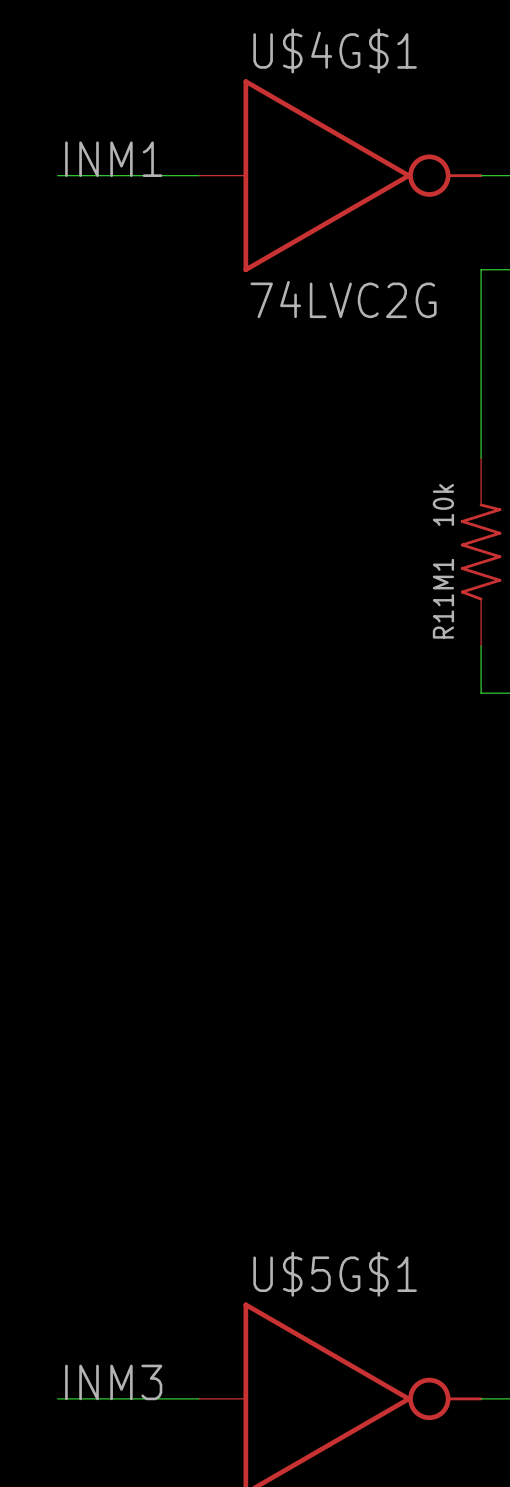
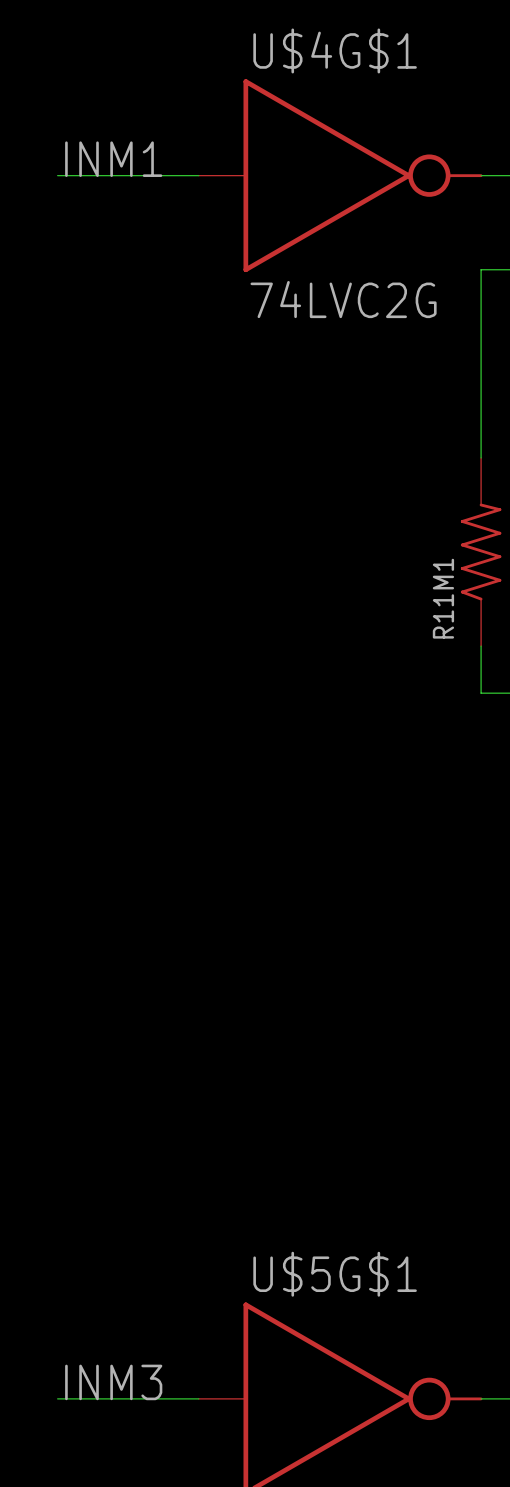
R11M1 value: 10k (443, 504) -> none

